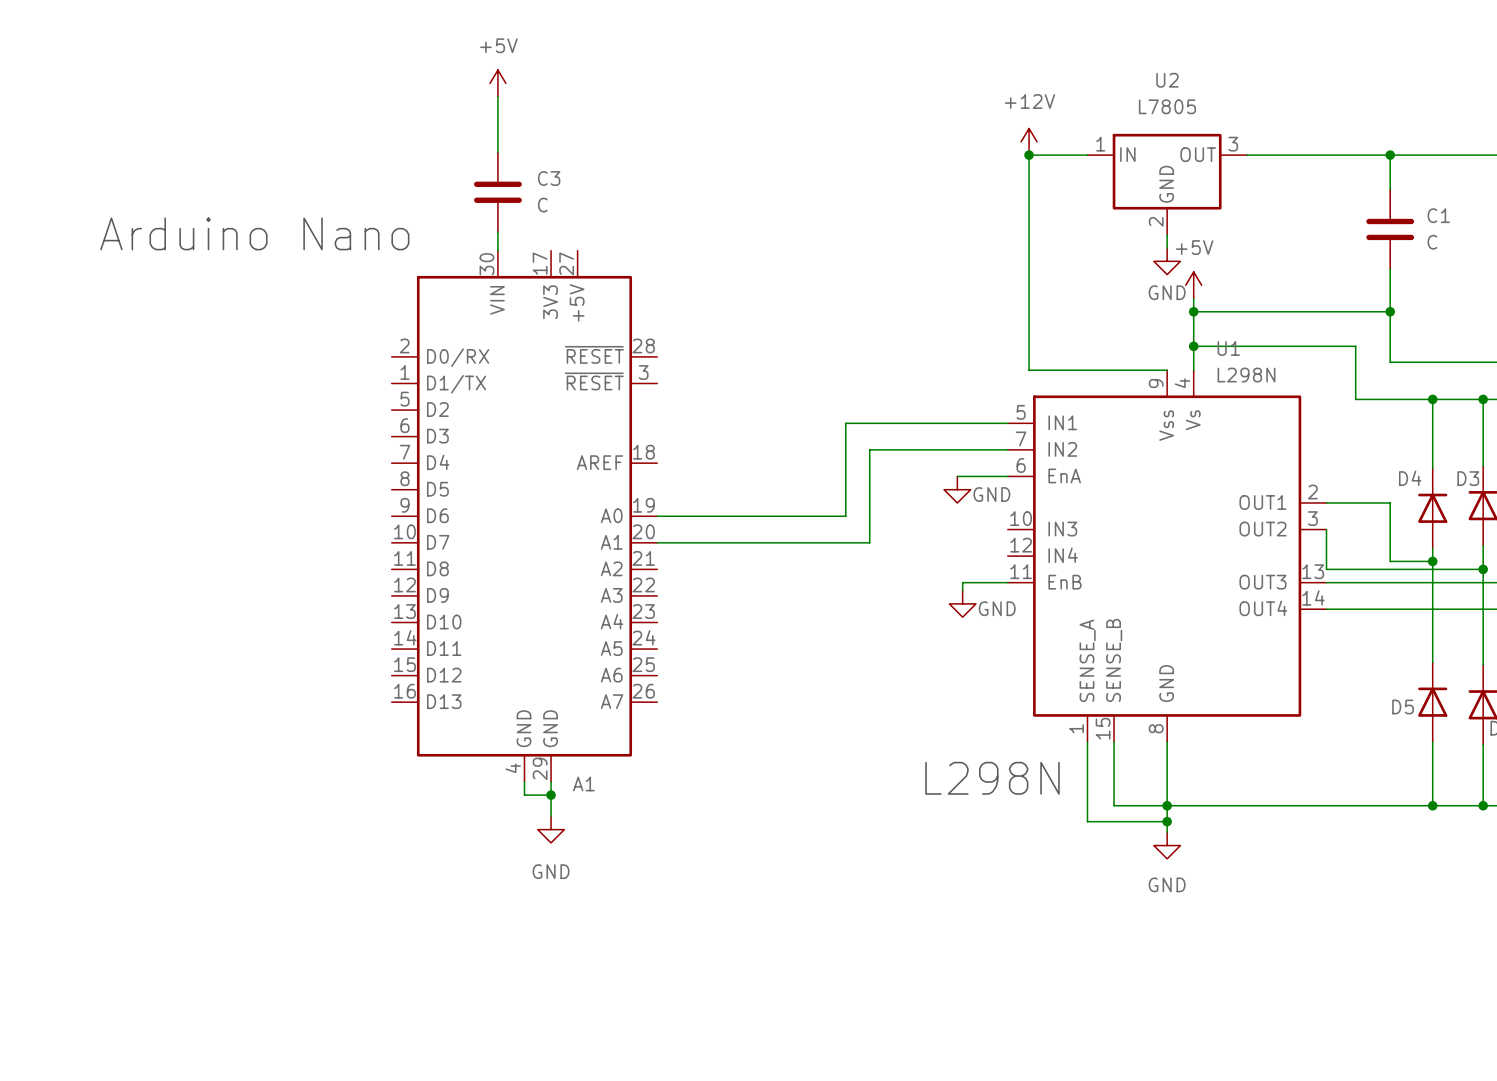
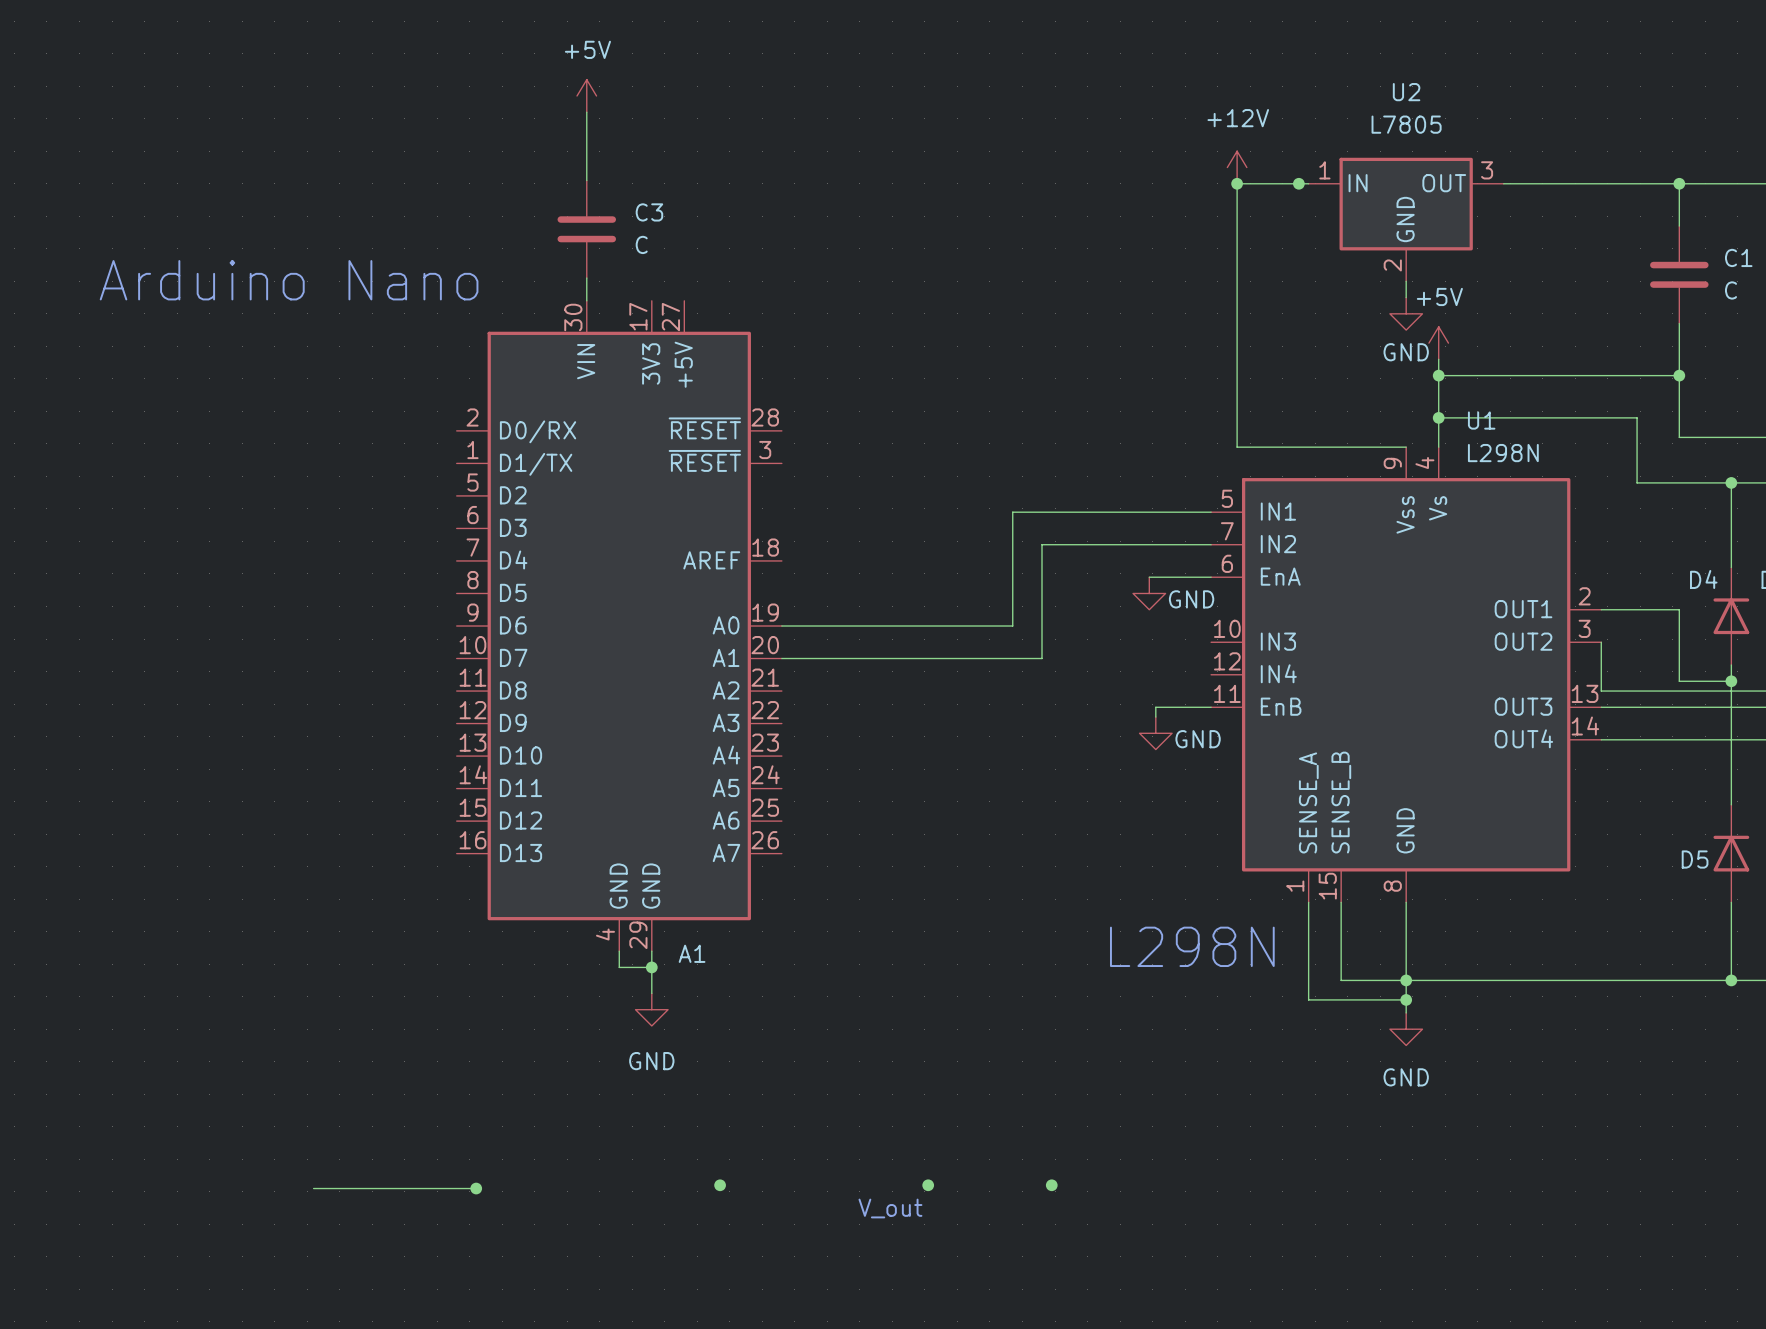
junction: none -> (1298, 183)
junction: none -> (720, 1185)
junction: none -> (928, 1185)
junction: none -> (1051, 1185)
wire: none -> (313, 1188) (476, 1188)
junction: none -> (476, 1188)
text: none -> V_out (890, 1208)

